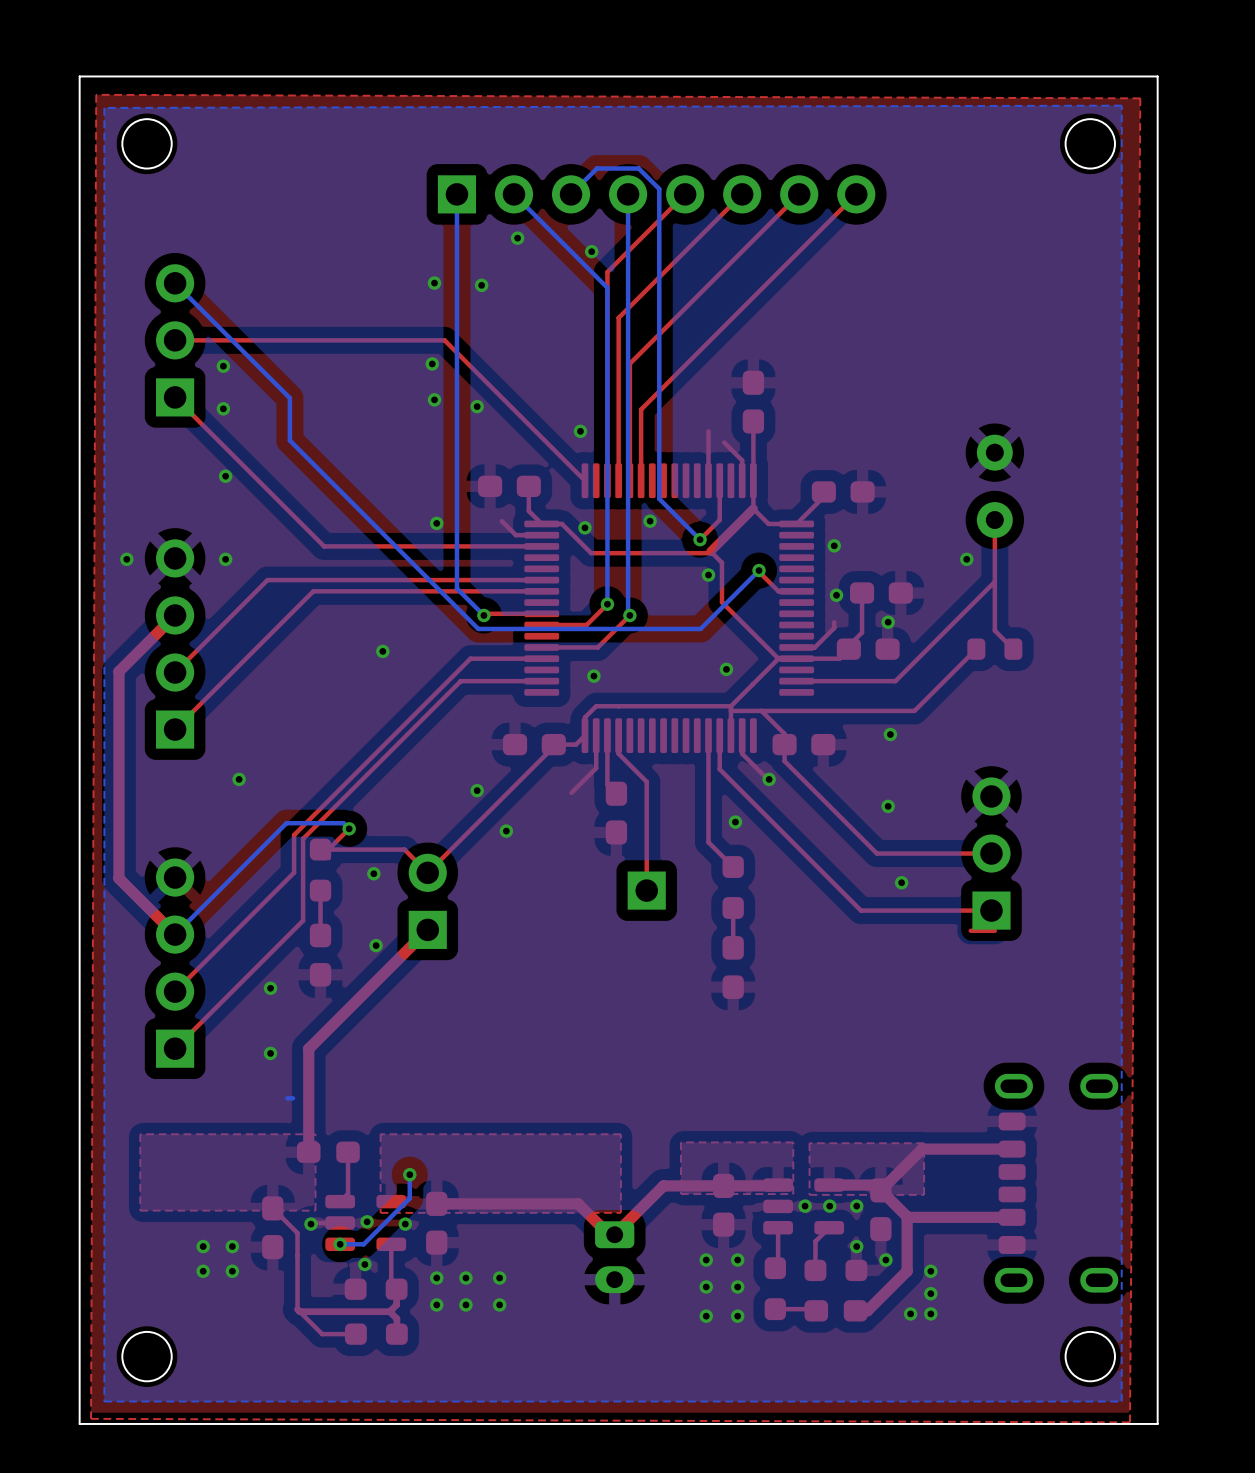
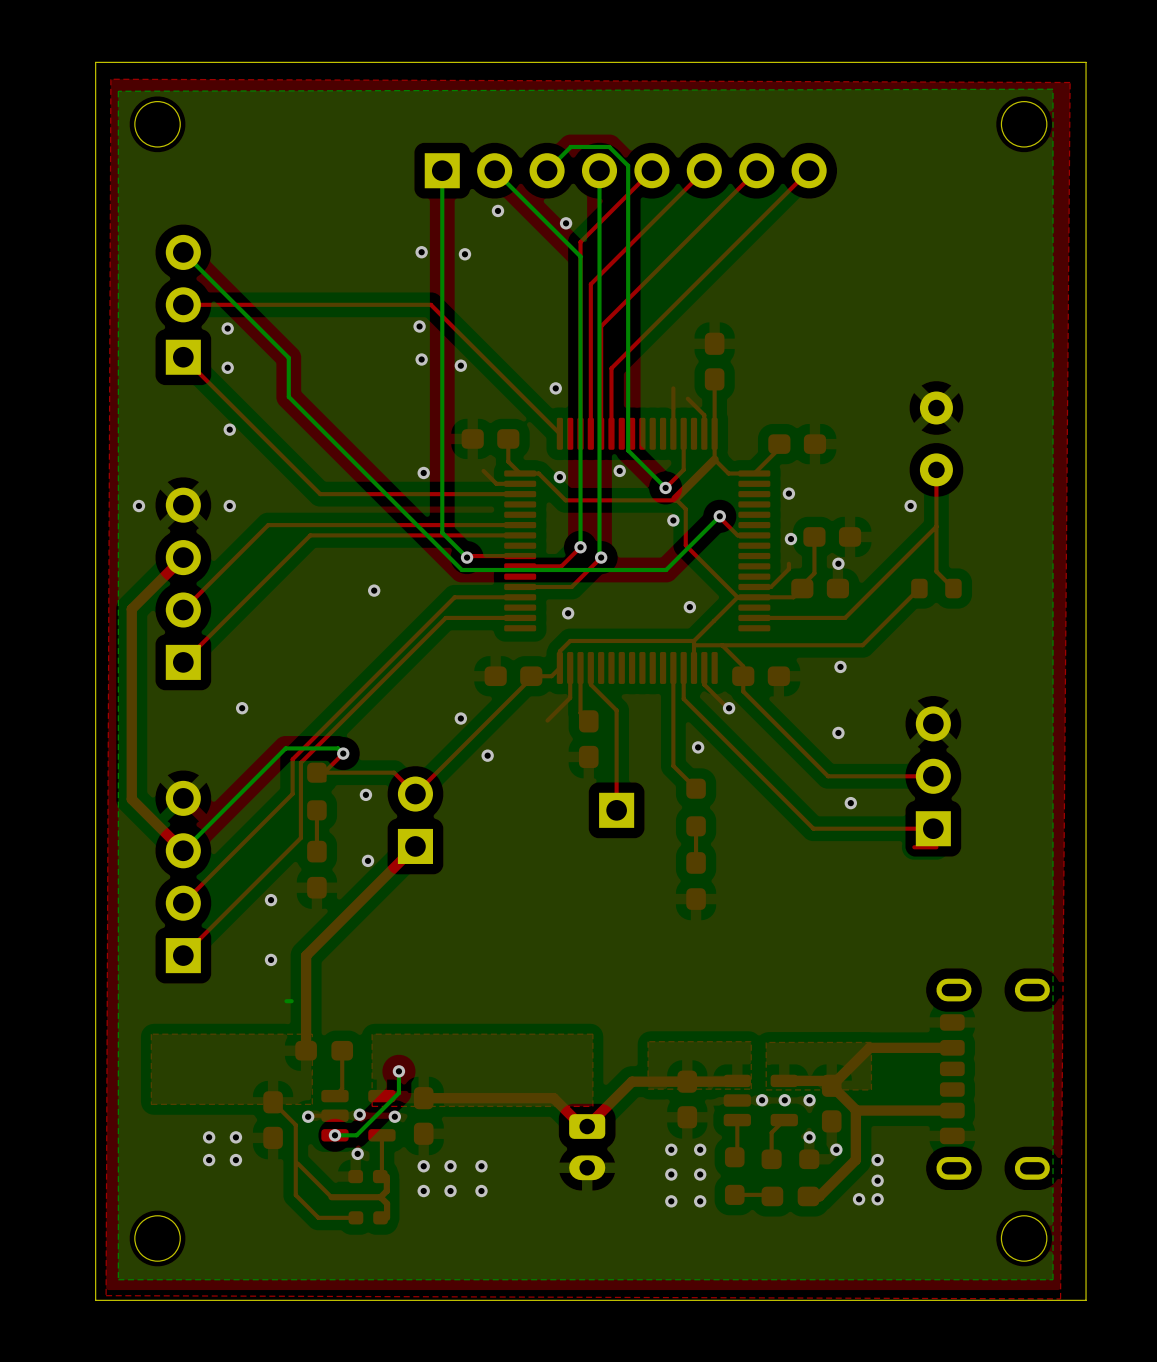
part footprint: [344, 1278, 408, 1300] -> [348, 1169, 388, 1184]
top track: (297, 1309) (299, 1311) (336, 1311) -> (297, 1163) (331, 1197)
part footprint: [344, 1323, 408, 1345] -> [348, 1211, 388, 1225]

